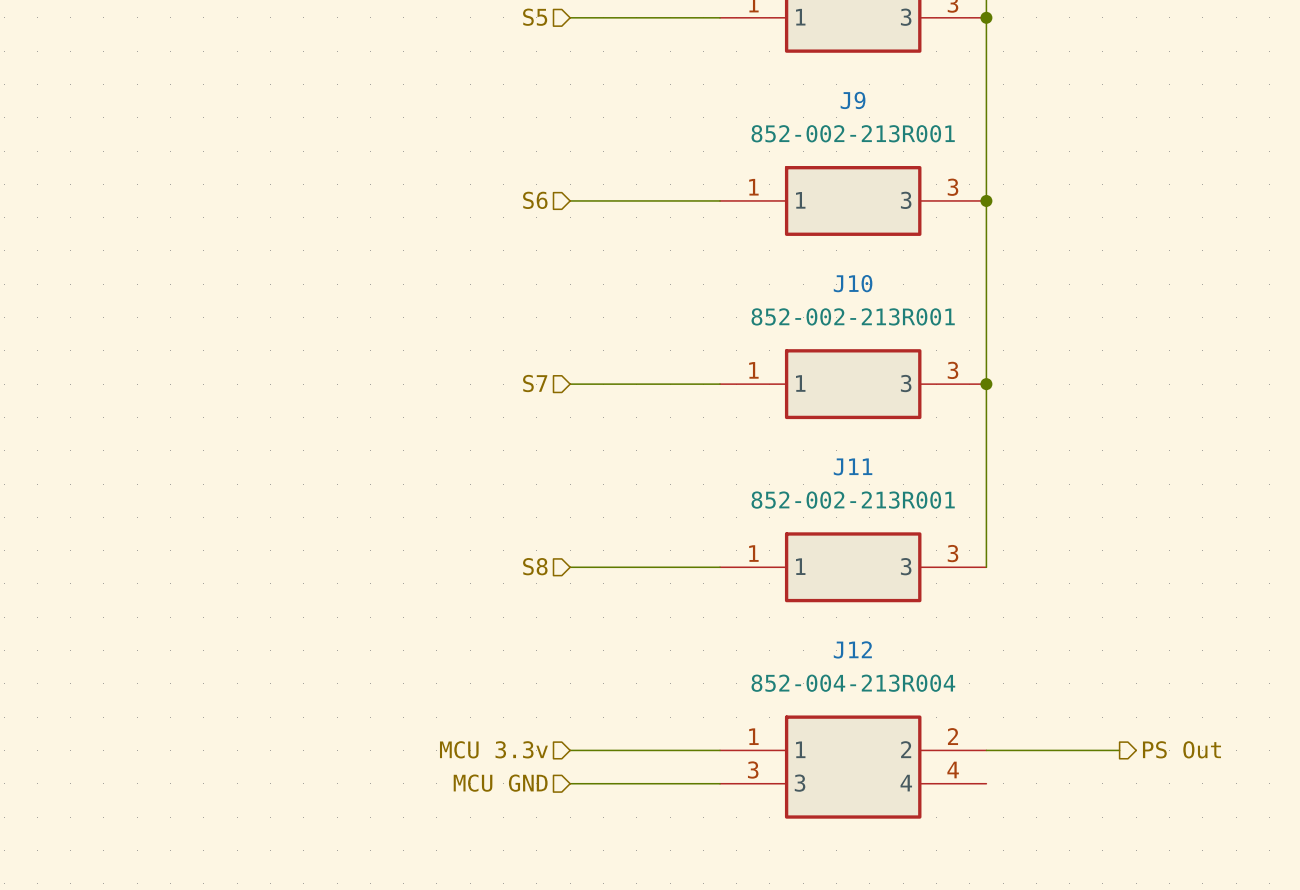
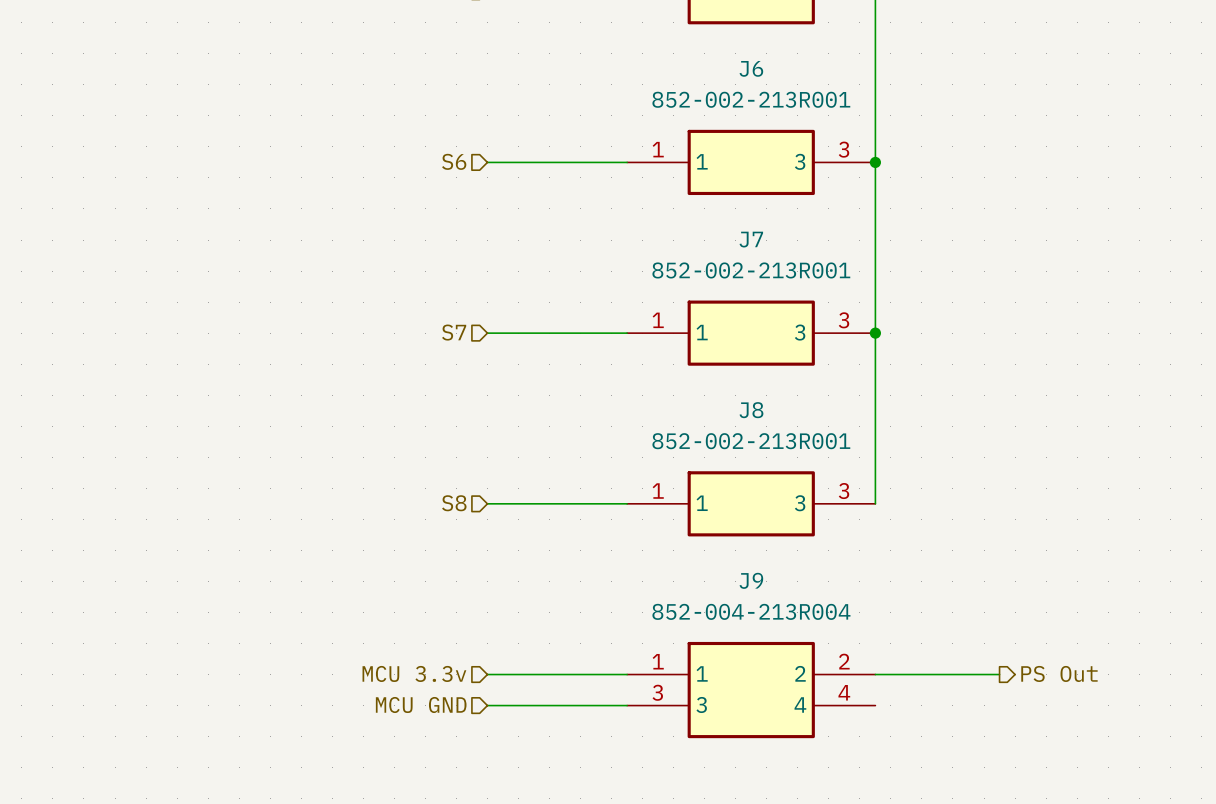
J9 name: J9 (853, 100) -> J6 (751, 68)
J10 name: J10 (853, 283) -> J7 (751, 239)
J11 name: J11 (853, 466) -> J8 (751, 410)
J12 name: J12 (852, 649) -> J9 (751, 580)

